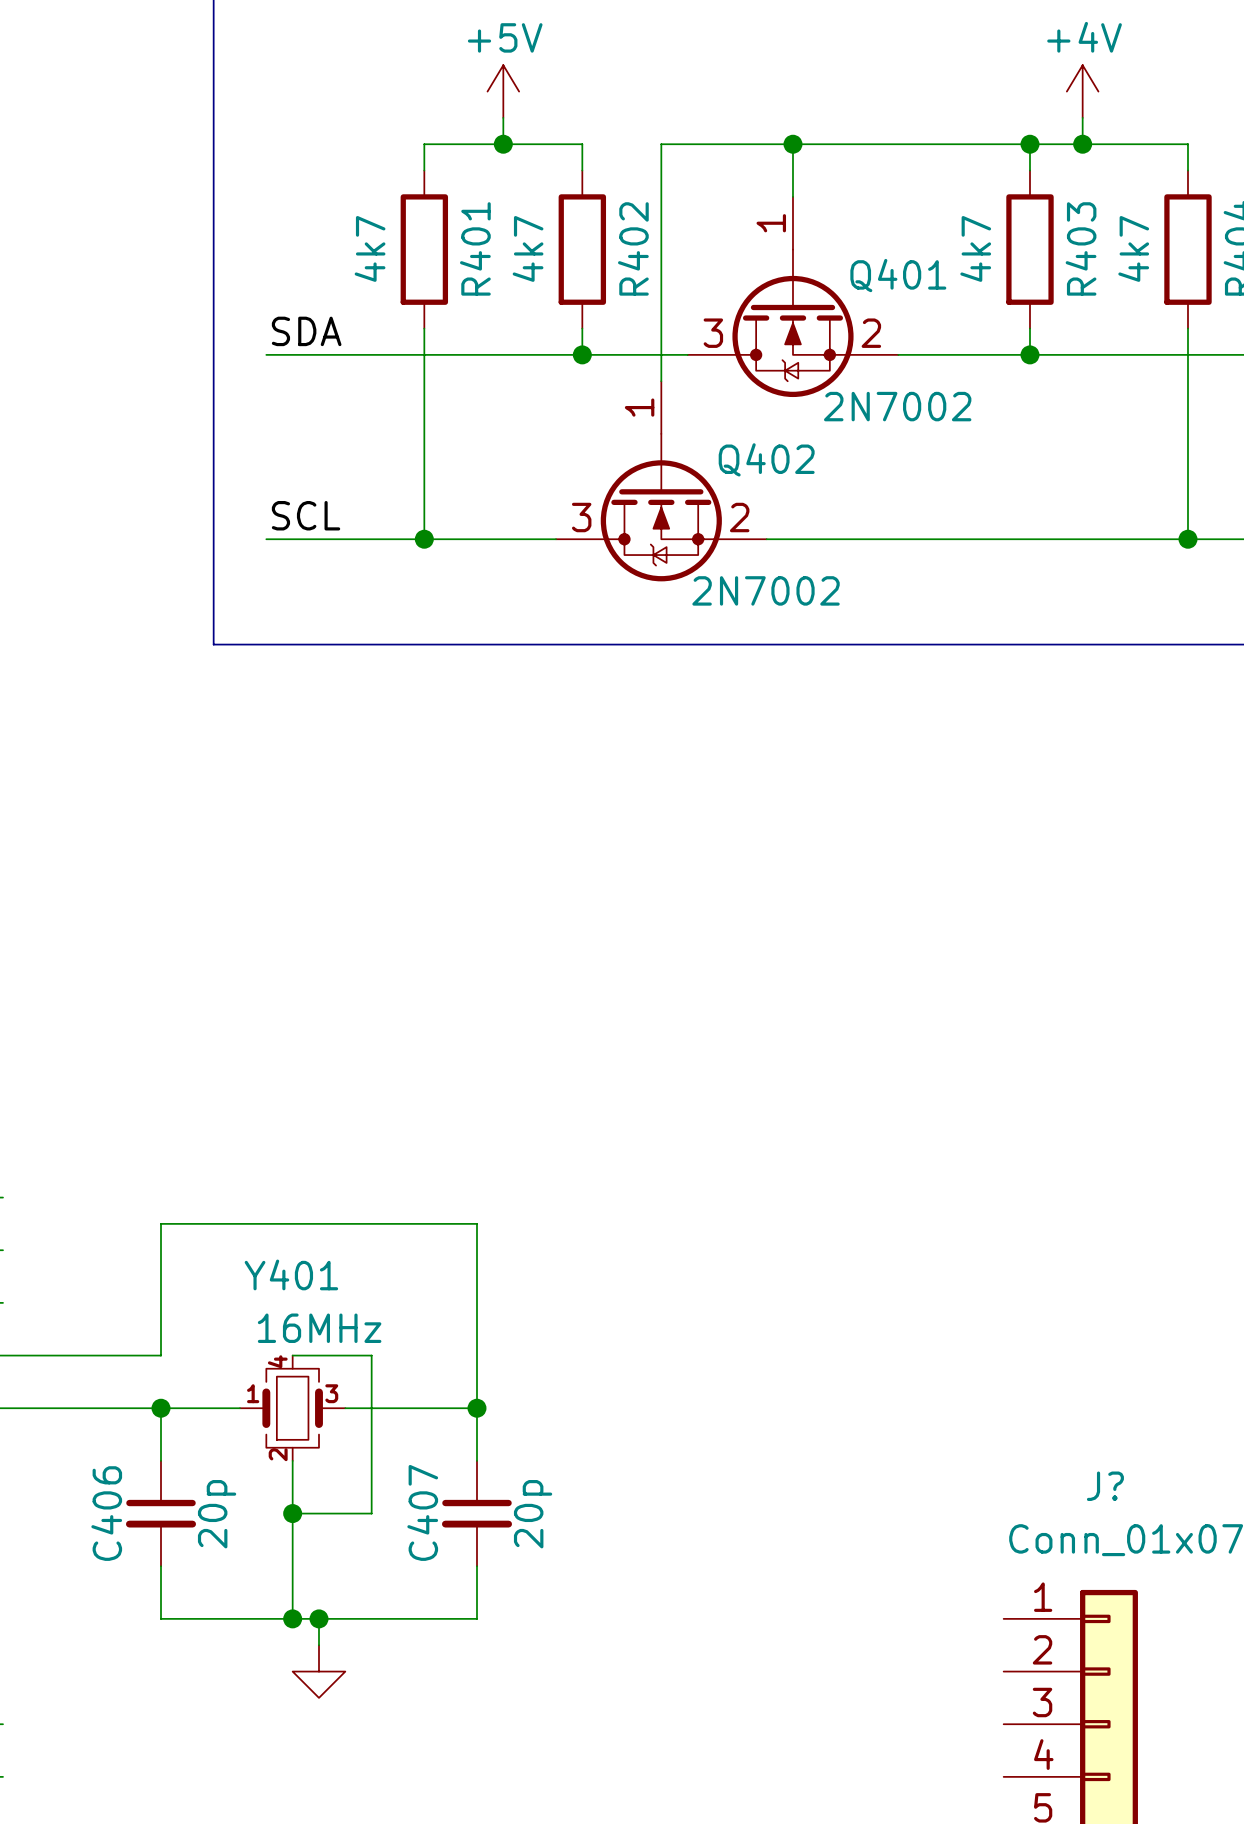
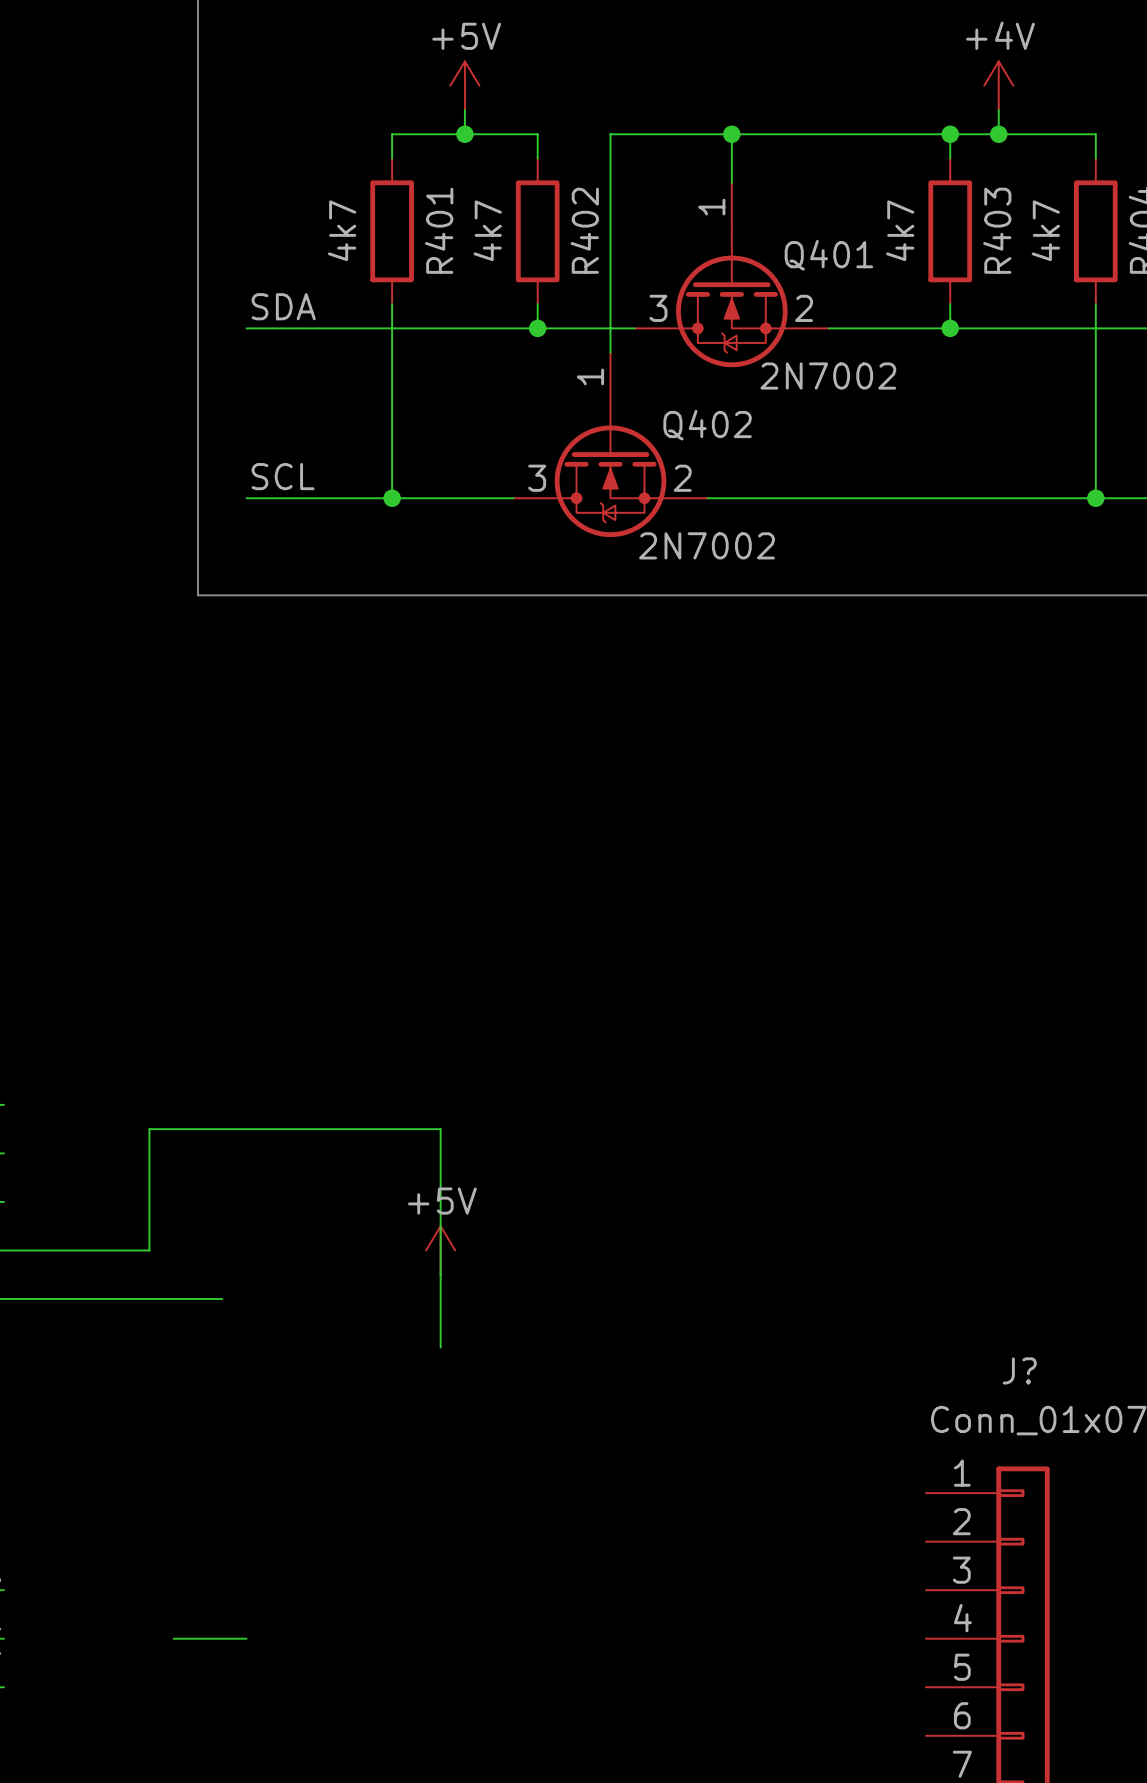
wire: (292, 1355) (371, 1355) (371, 1513) (292, 1513) -> none
power symbol: none -> +5V (440, 1250)
wire: (160, 1408) (160, 1460) -> none
junction: (160, 1408) -> none
Y401: 16MHz (292, 1408) -> none
wire: (345, 1408) (476, 1408) -> none
junction: (476, 1408) -> none
wire: (292, 1460) (292, 1618) -> none
C406: 20p (160, 1513) -> none
junction: (292, 1513) -> none
C407: 20p (476, 1513) -> none
wire: (160, 1566) (160, 1618) (476, 1618) (476, 1566) -> none
junction: (292, 1618) -> none
wire: (318, 1618) (318, 1645) -> none
junction: (318, 1618) -> none
power symbol: (318, 1671) -> none
wire: none -> (173, 1638) (246, 1638)

